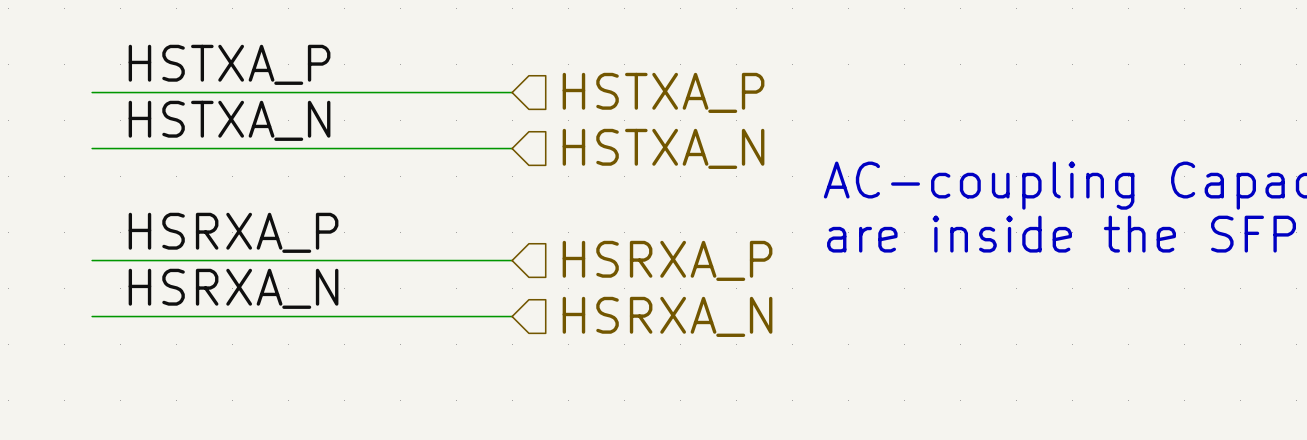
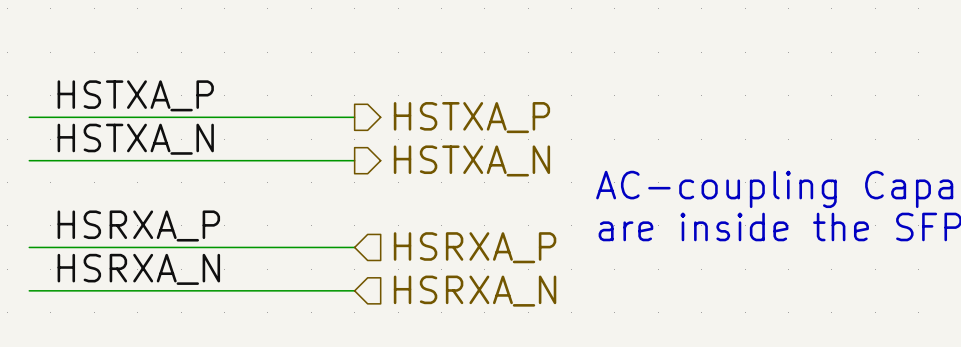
hierarchical label shape: input (663, 92) -> output (471, 117)
hierarchical label shape: input (663, 148) -> output (471, 160)

